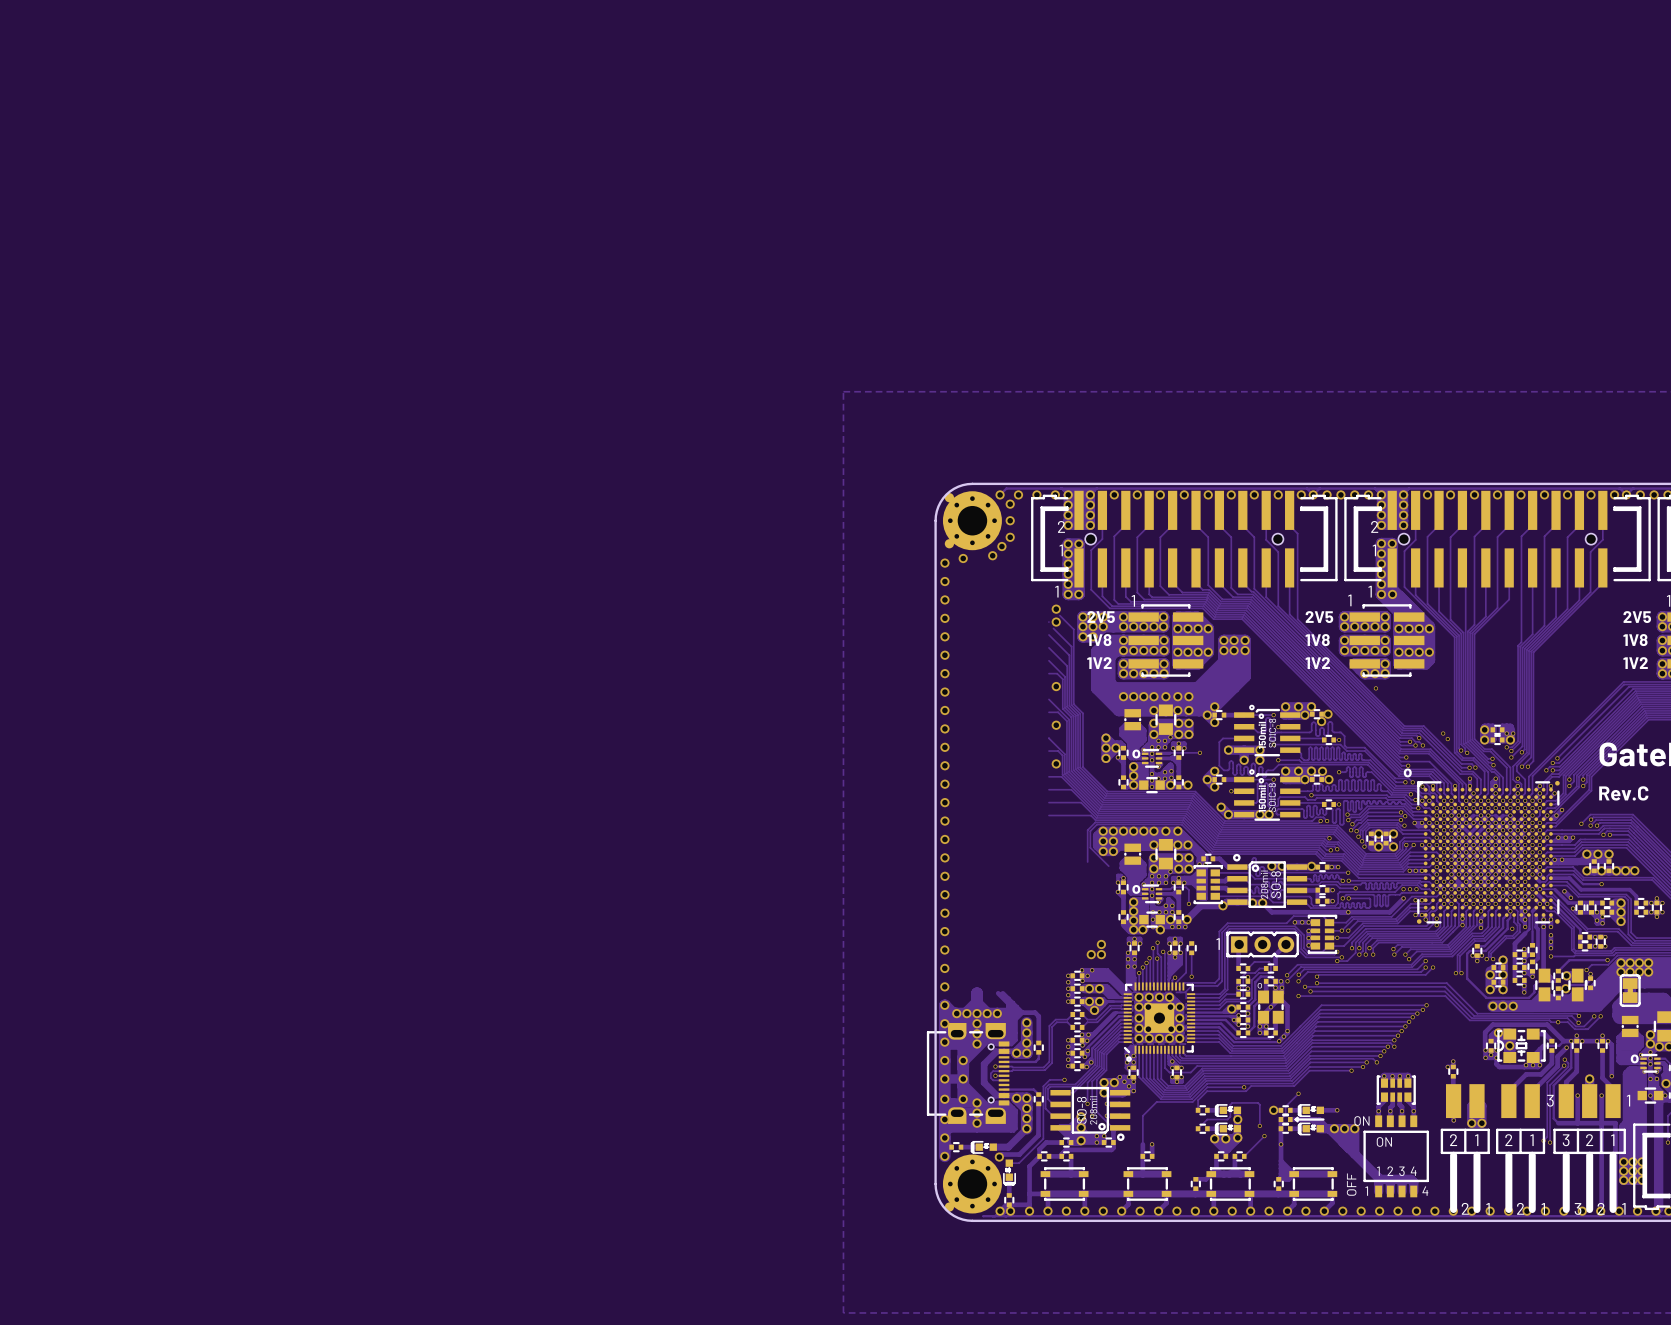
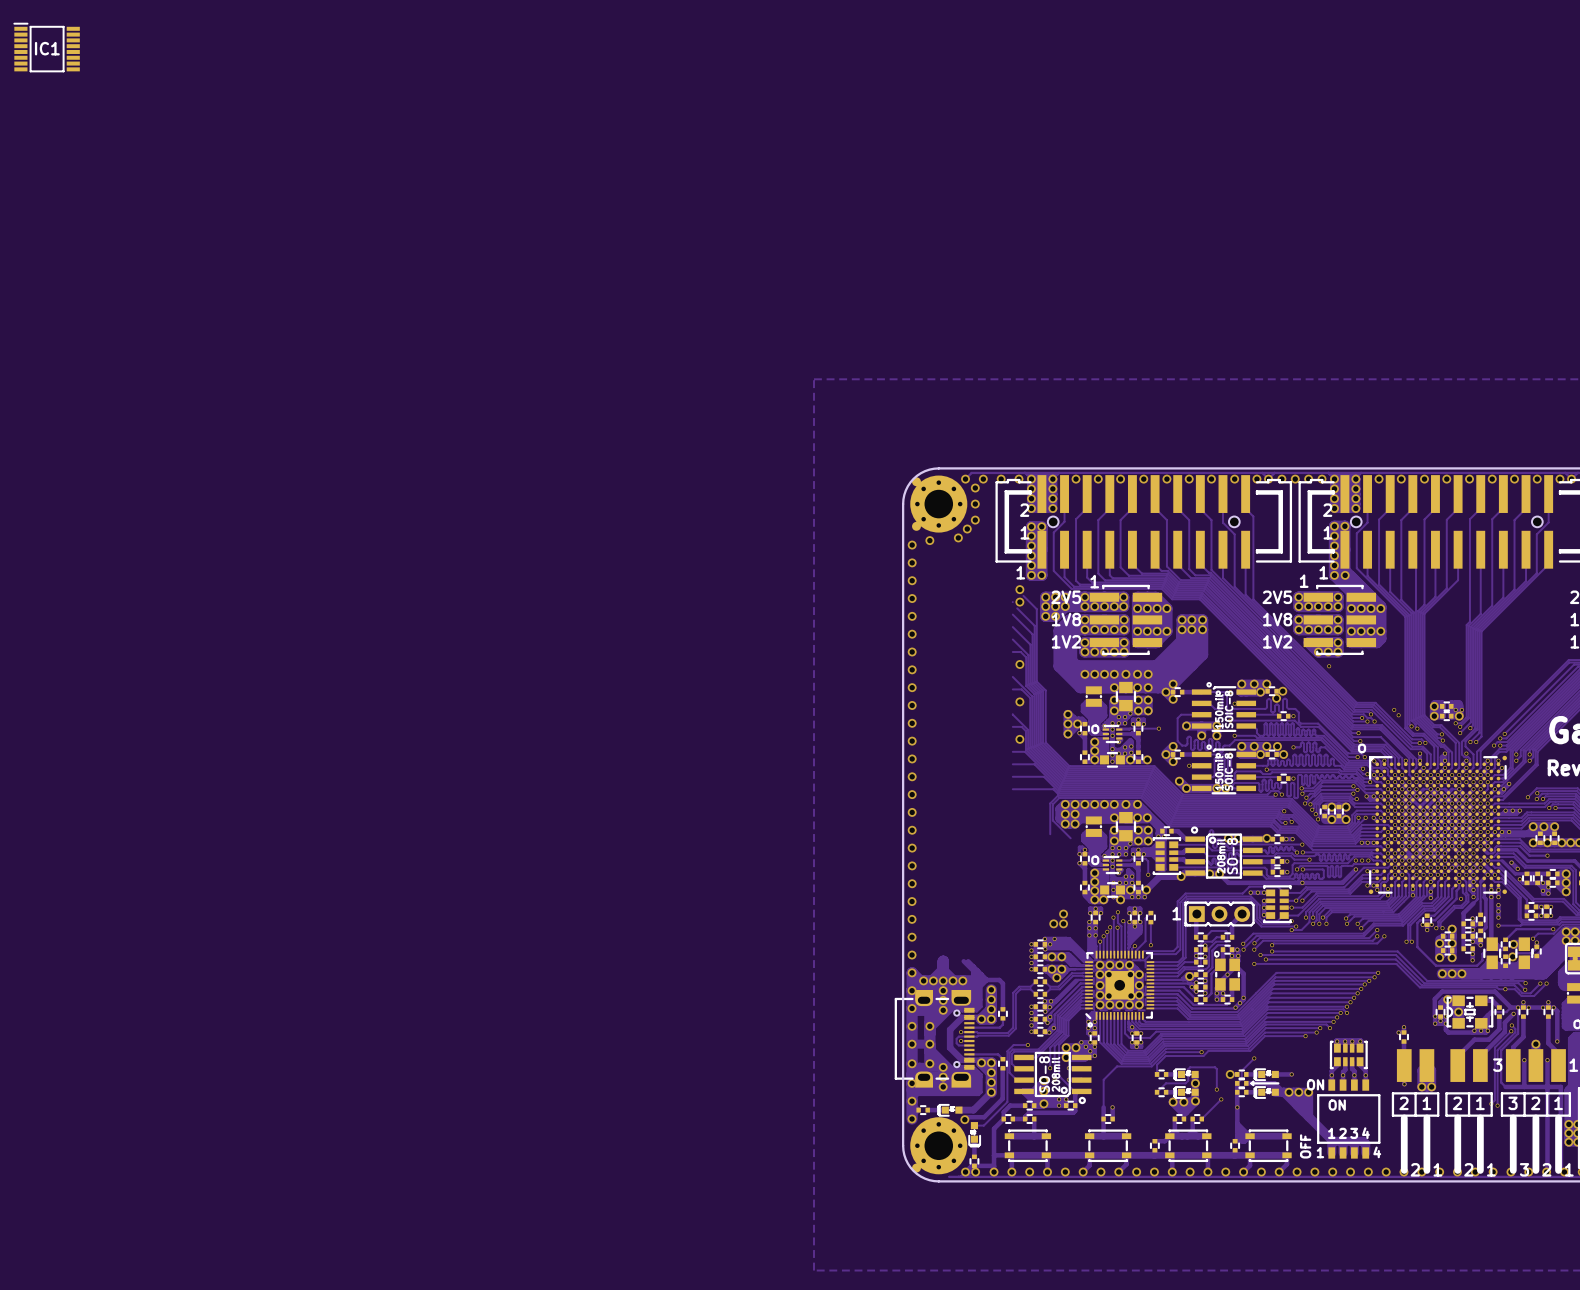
IC1: none -> (46, 47)

